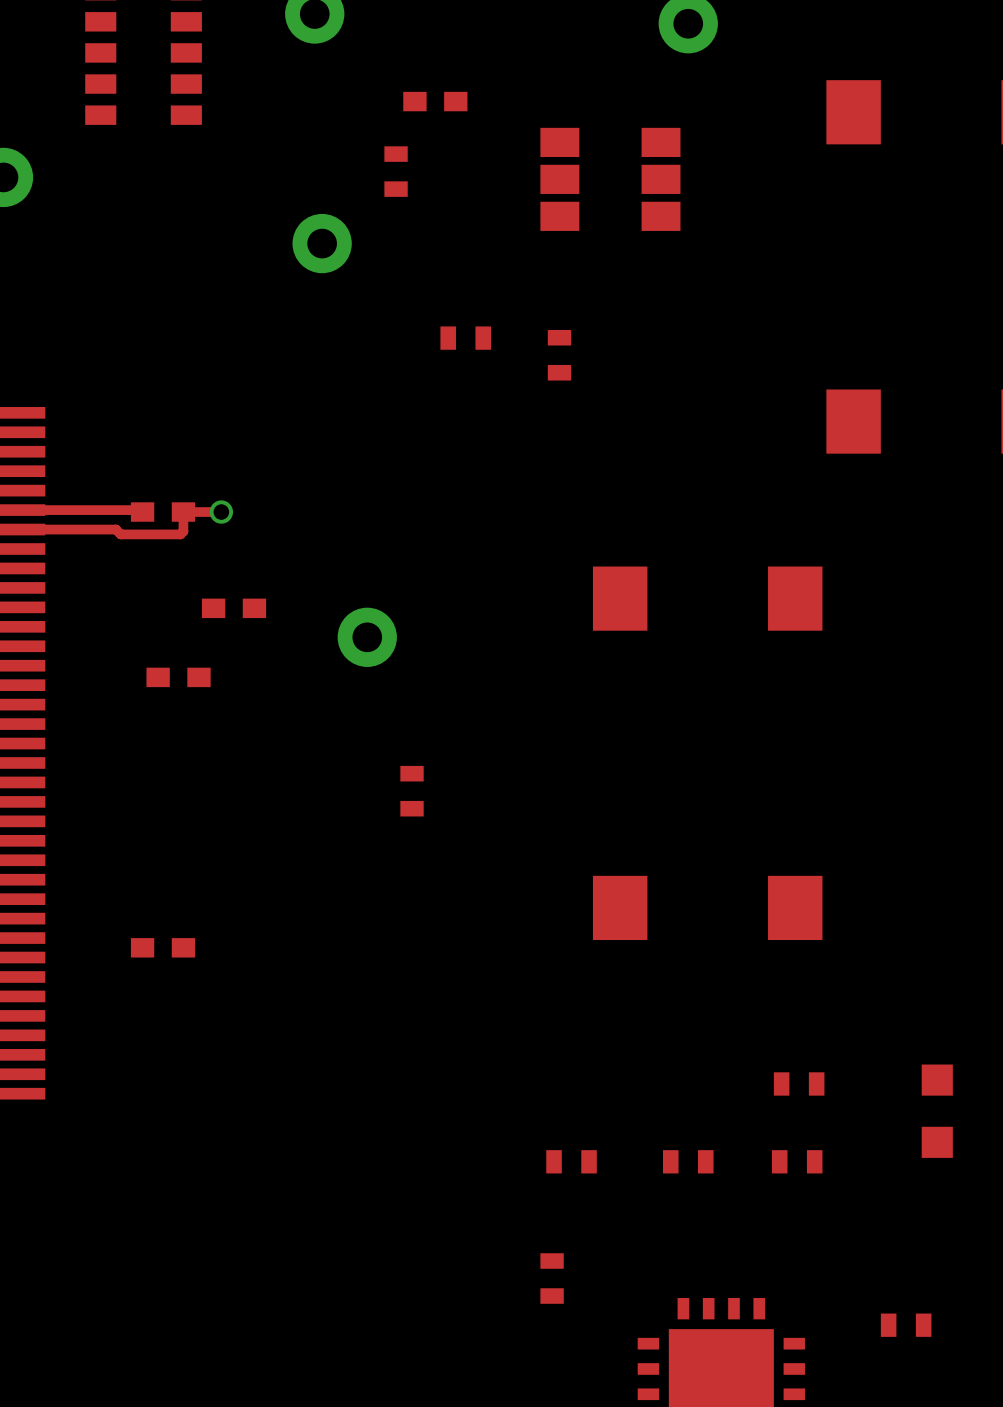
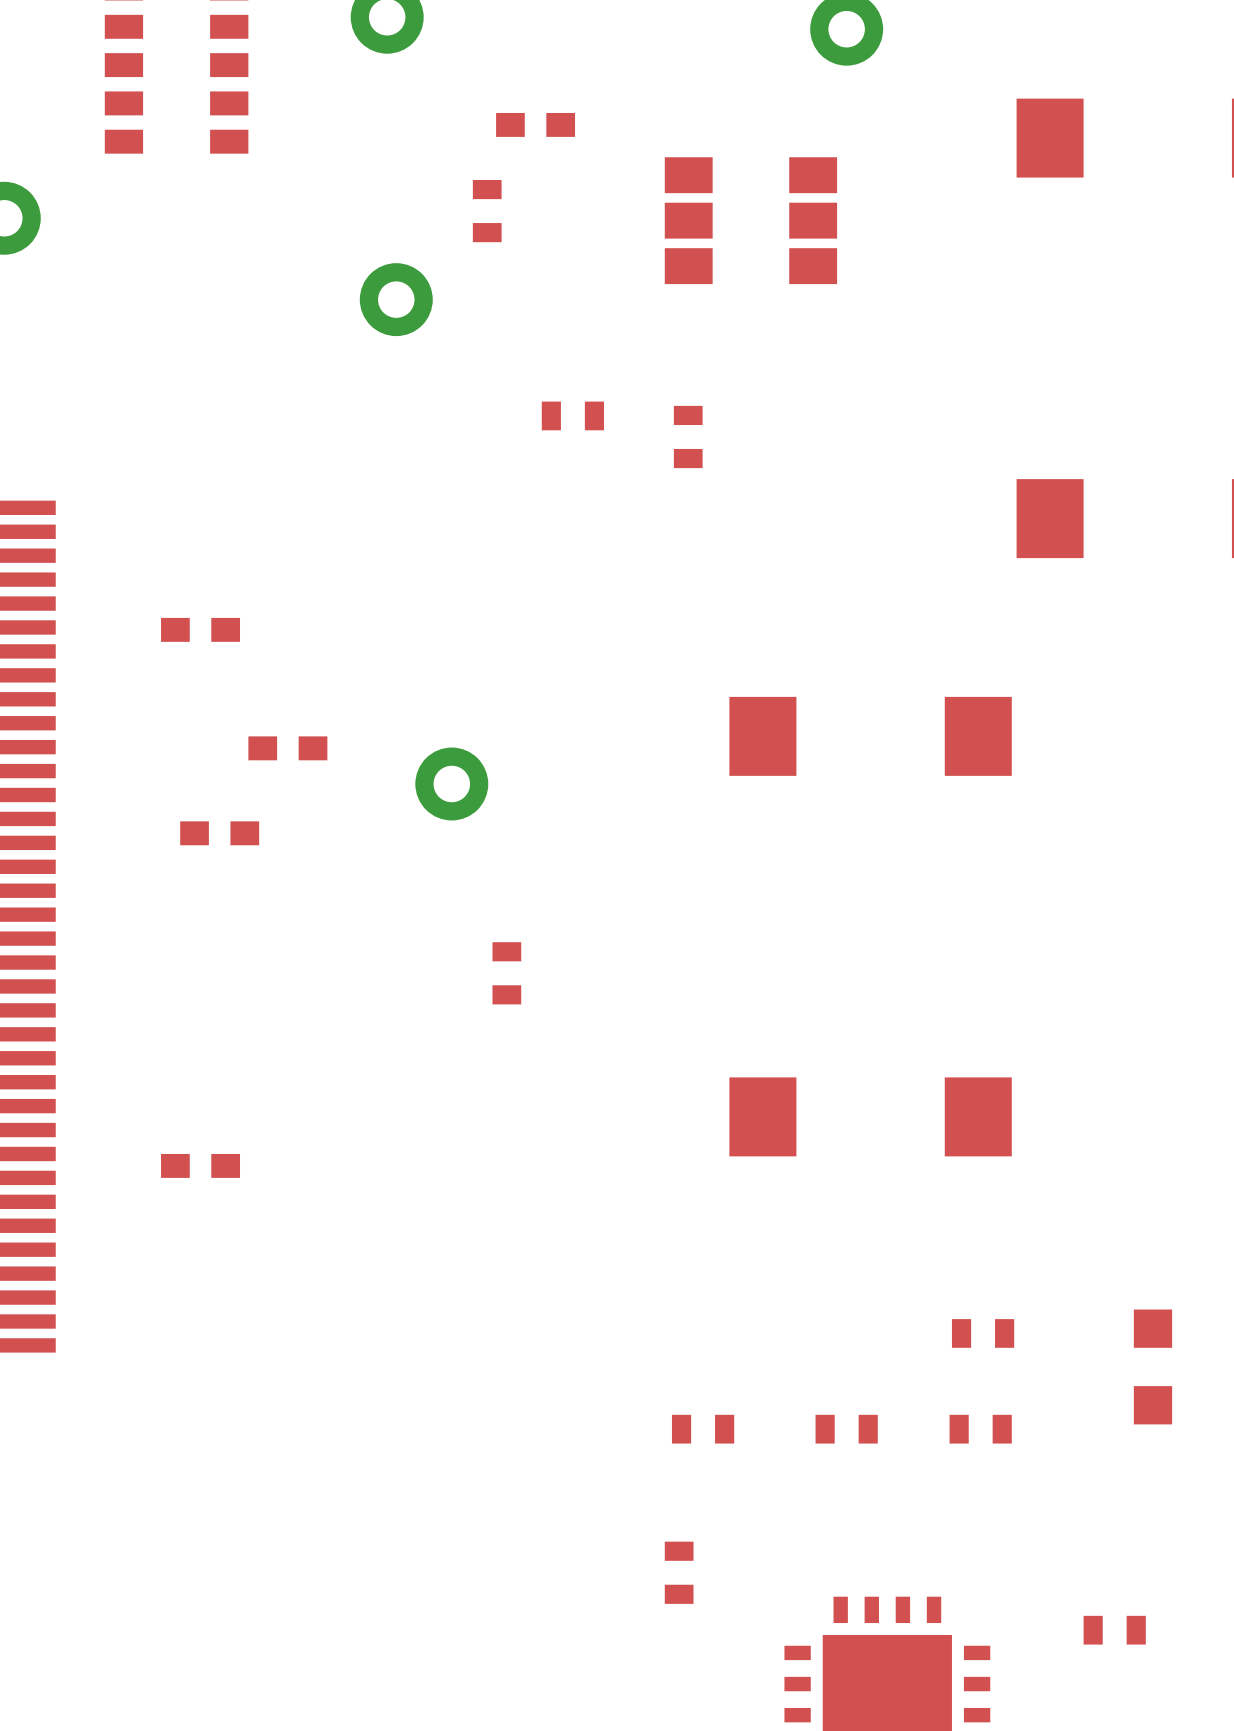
top track: (15, 510) (140, 510) (142, 512) -> none
top track: (221, 512) (183, 512) (183, 531) (180, 534) (120, 534) (115, 529) (15, 529) -> none
via: (221, 512) -> none

